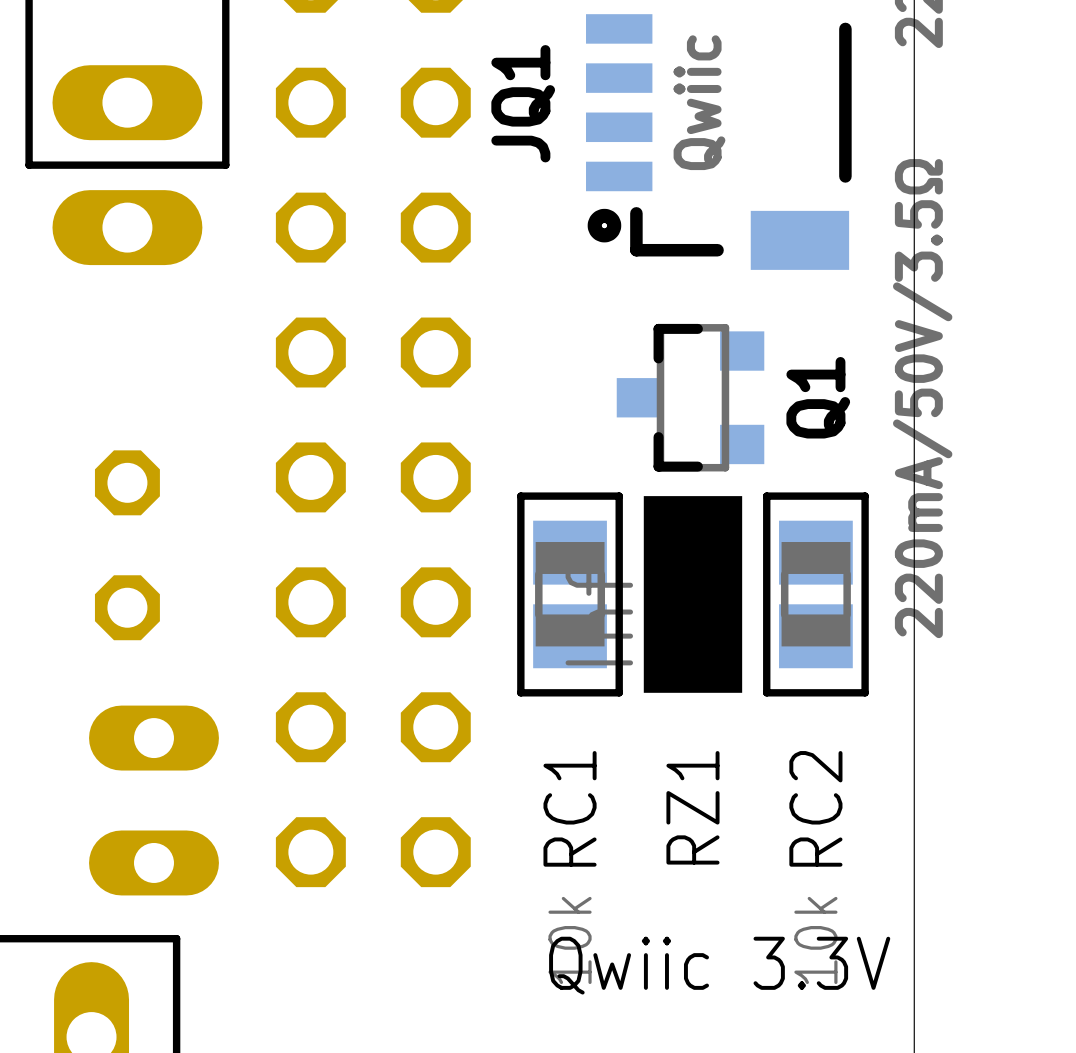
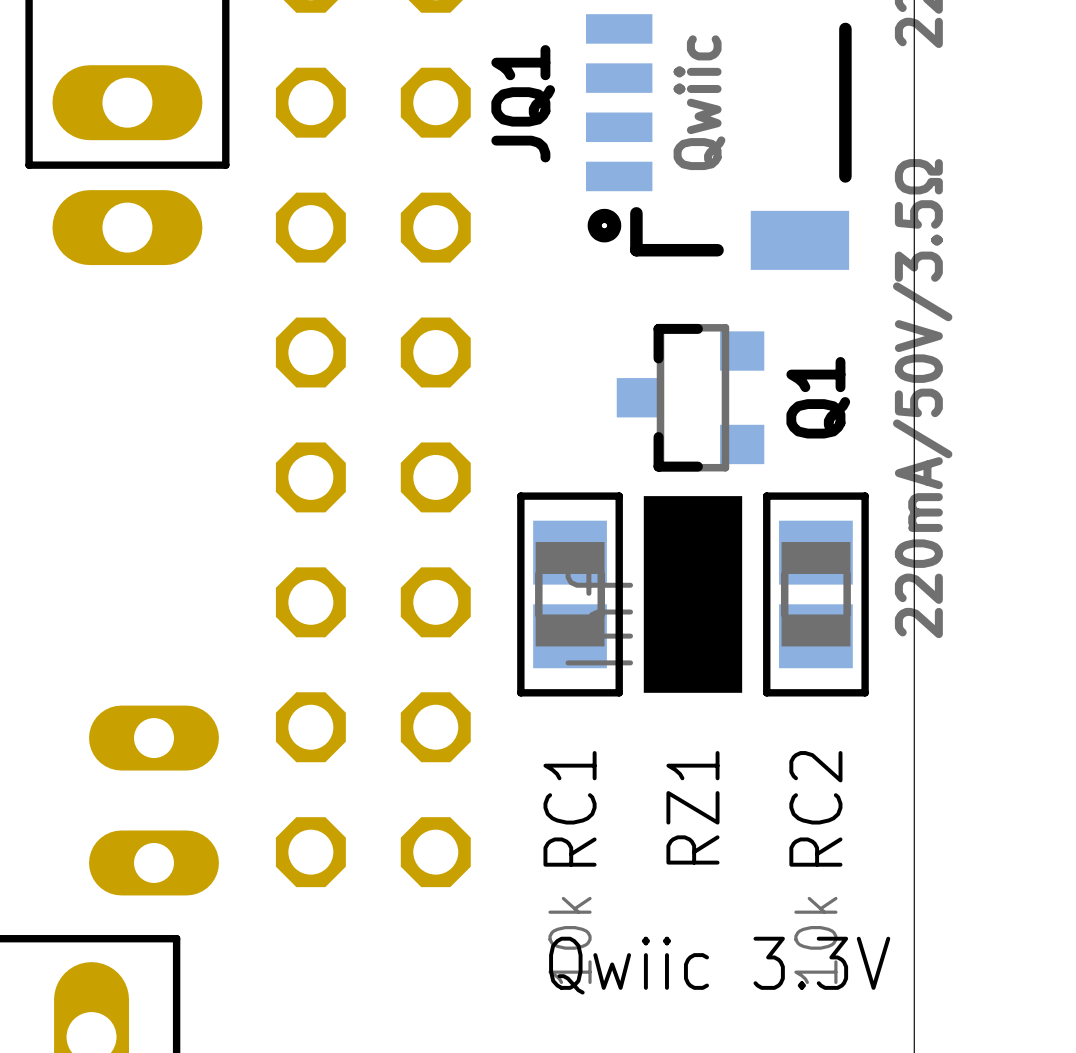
part: (127, 545) -> none

